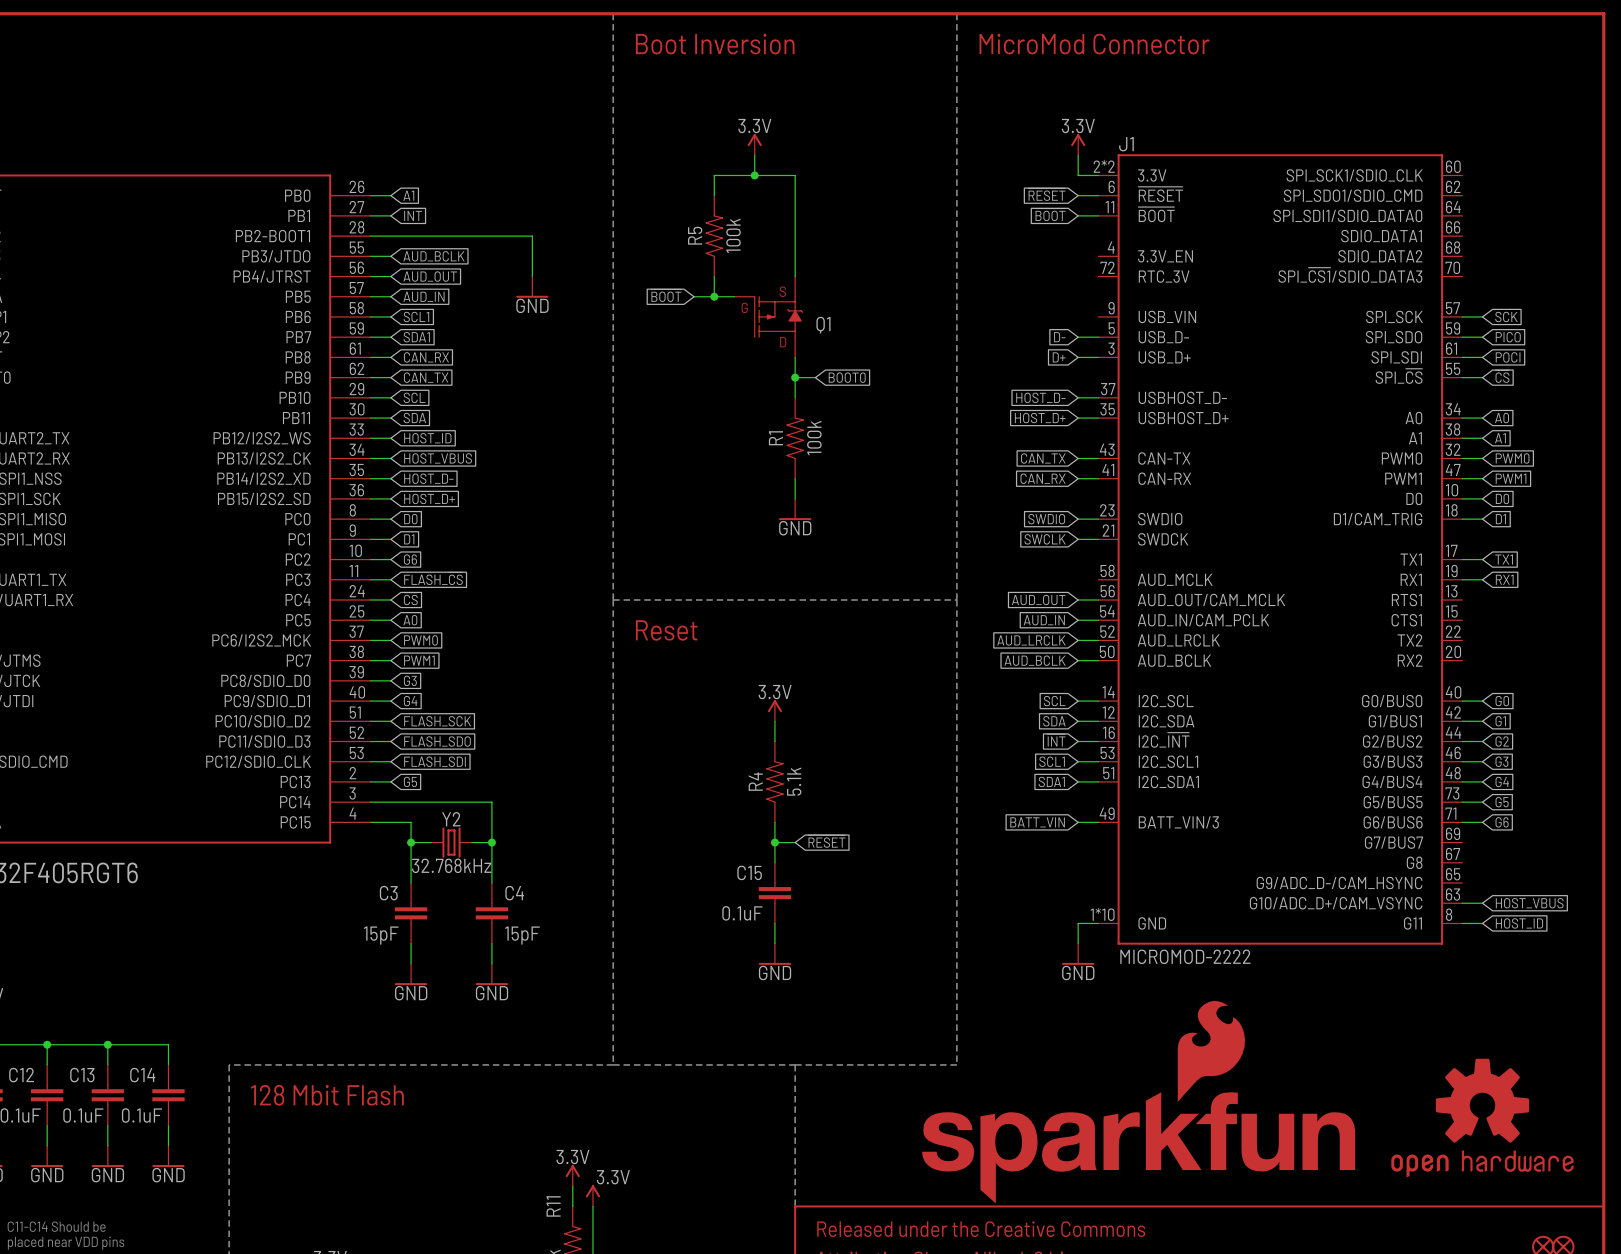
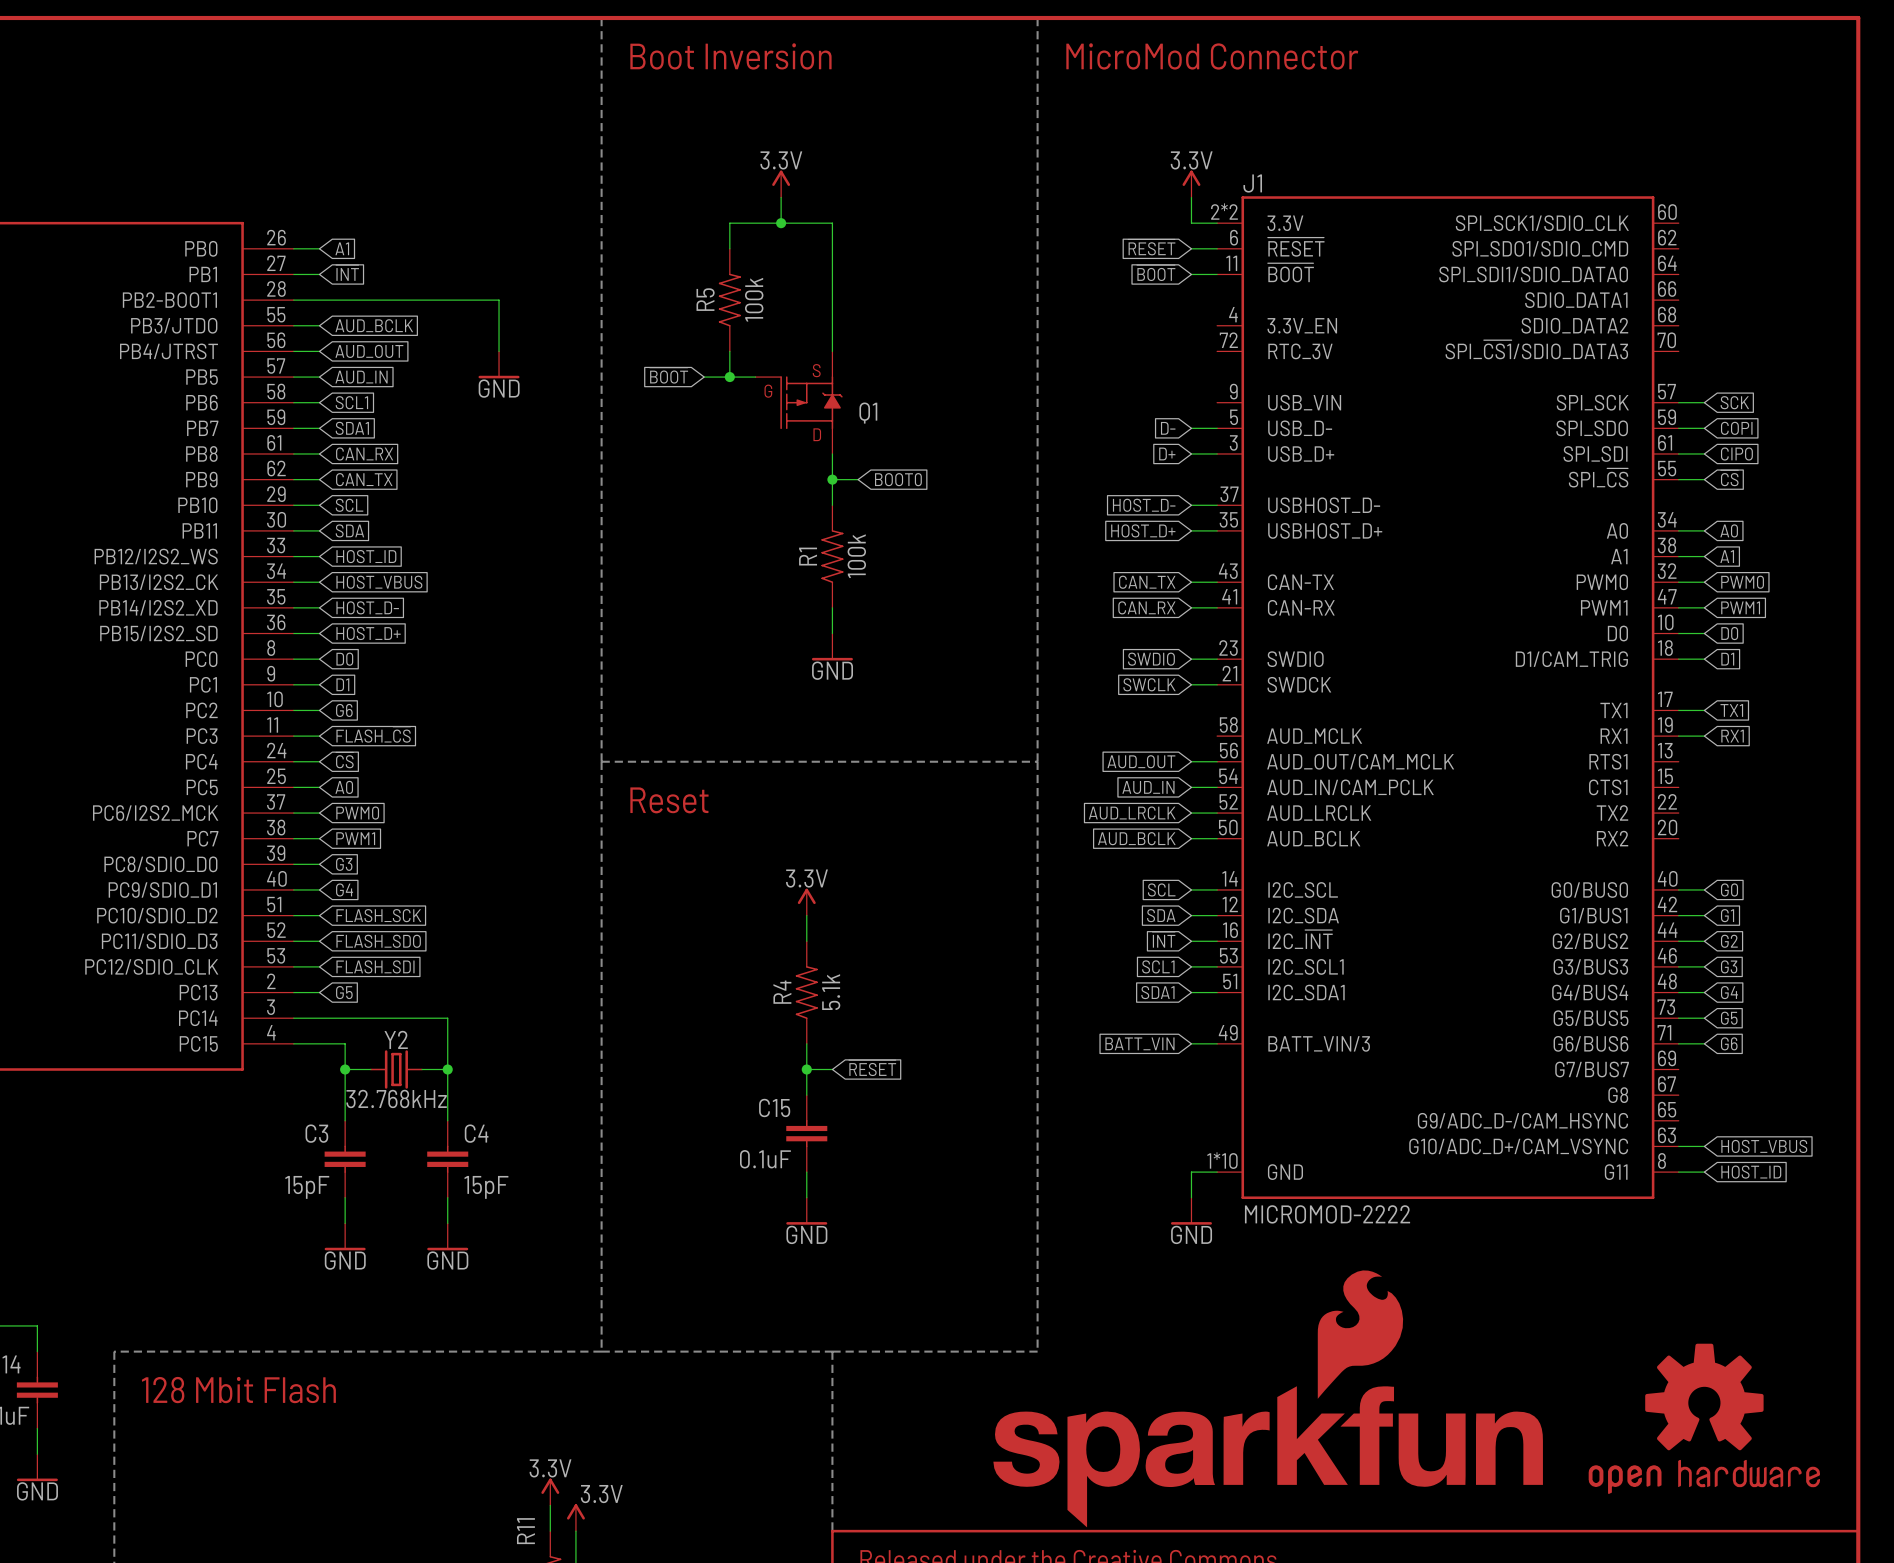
global label: PICO (1508, 337) -> COPI (1736, 428)
global label: POCI (1508, 357) -> CIPO (1736, 454)

